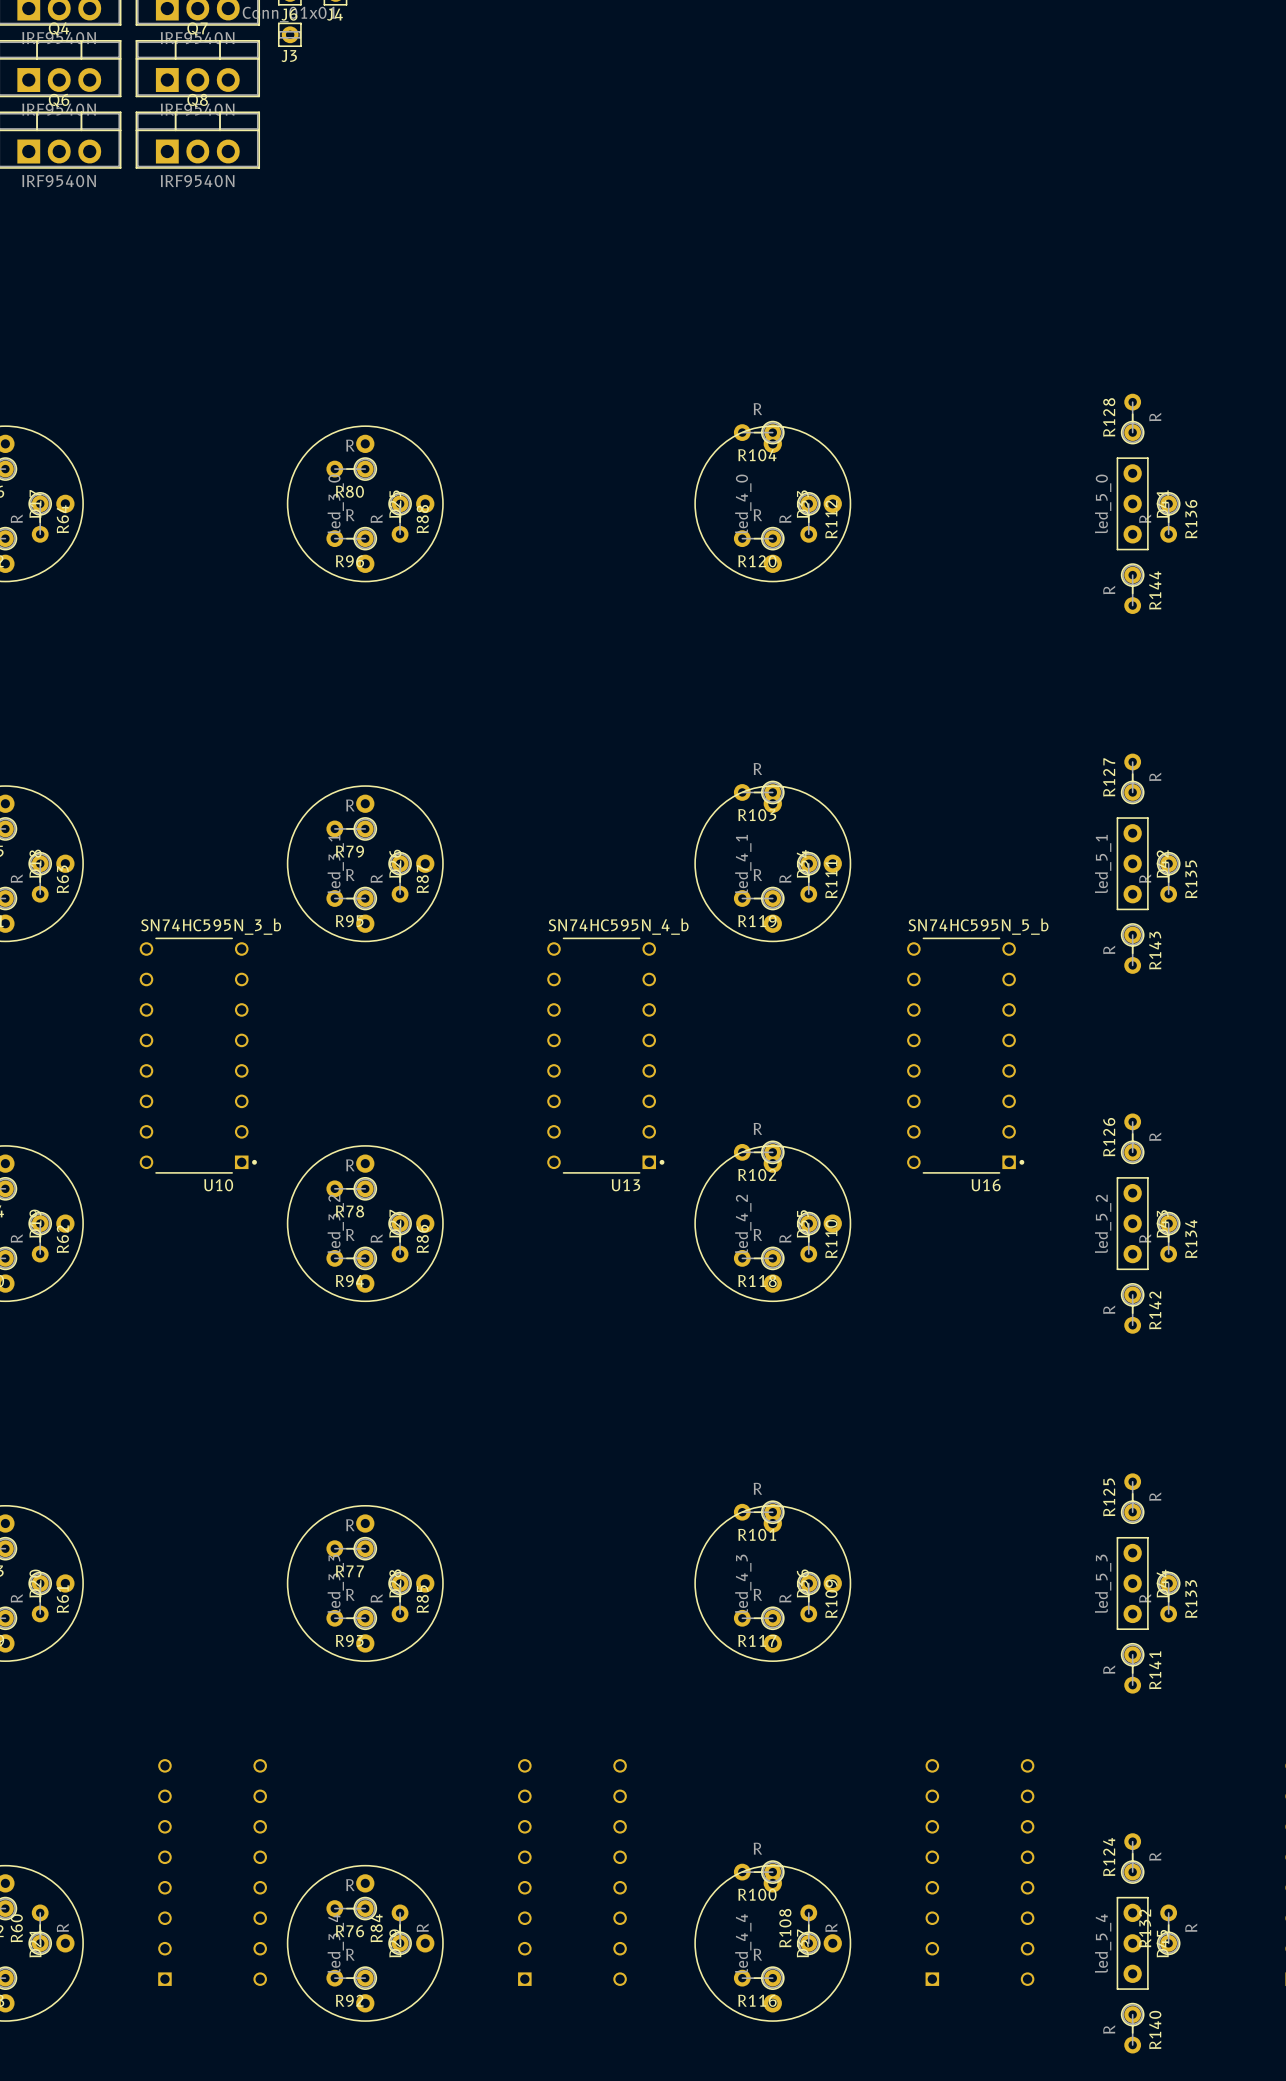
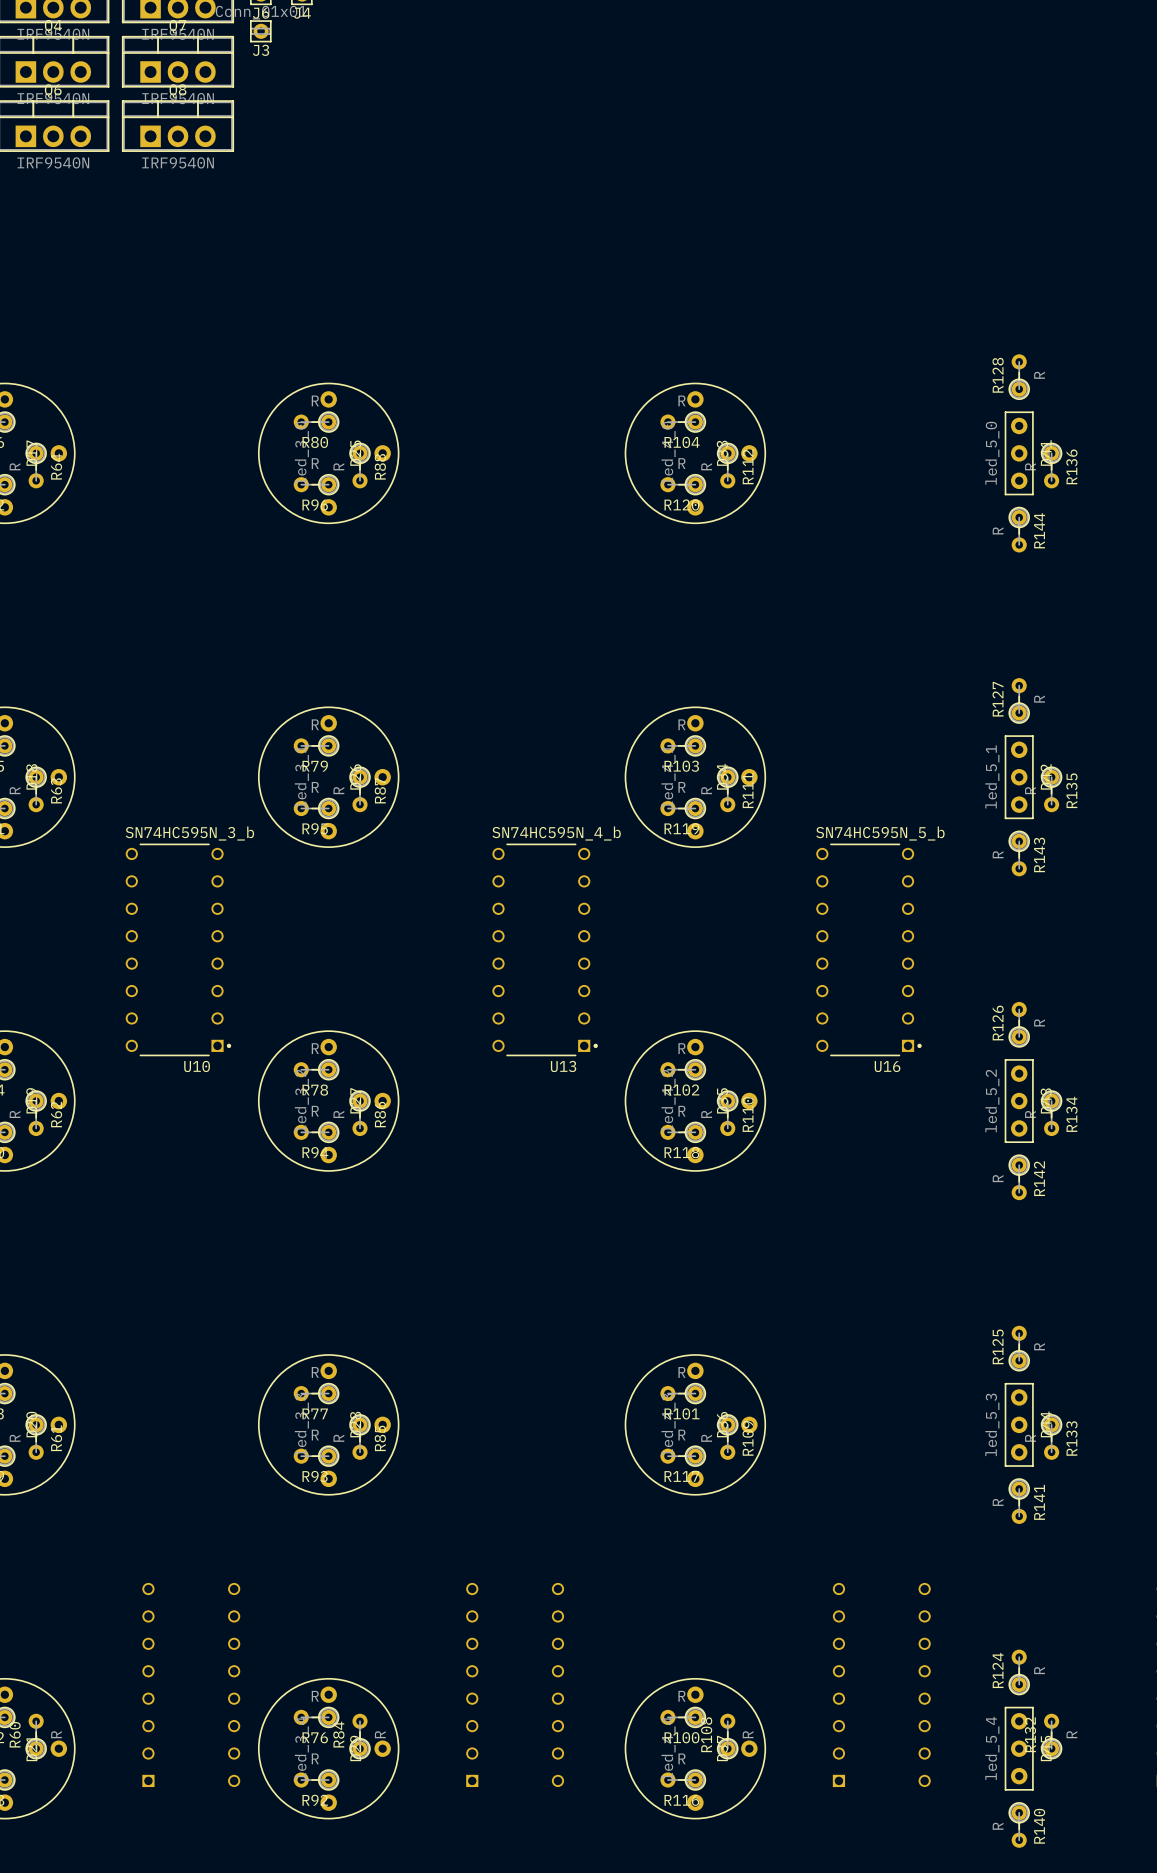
R104 position: (759, 432) -> (683, 422)
R103 position: (759, 792) -> (683, 745)
R102 position: (759, 1152) -> (683, 1069)
R101 position: (759, 1512) -> (683, 1393)
R100 position: (759, 1872) -> (683, 1717)

